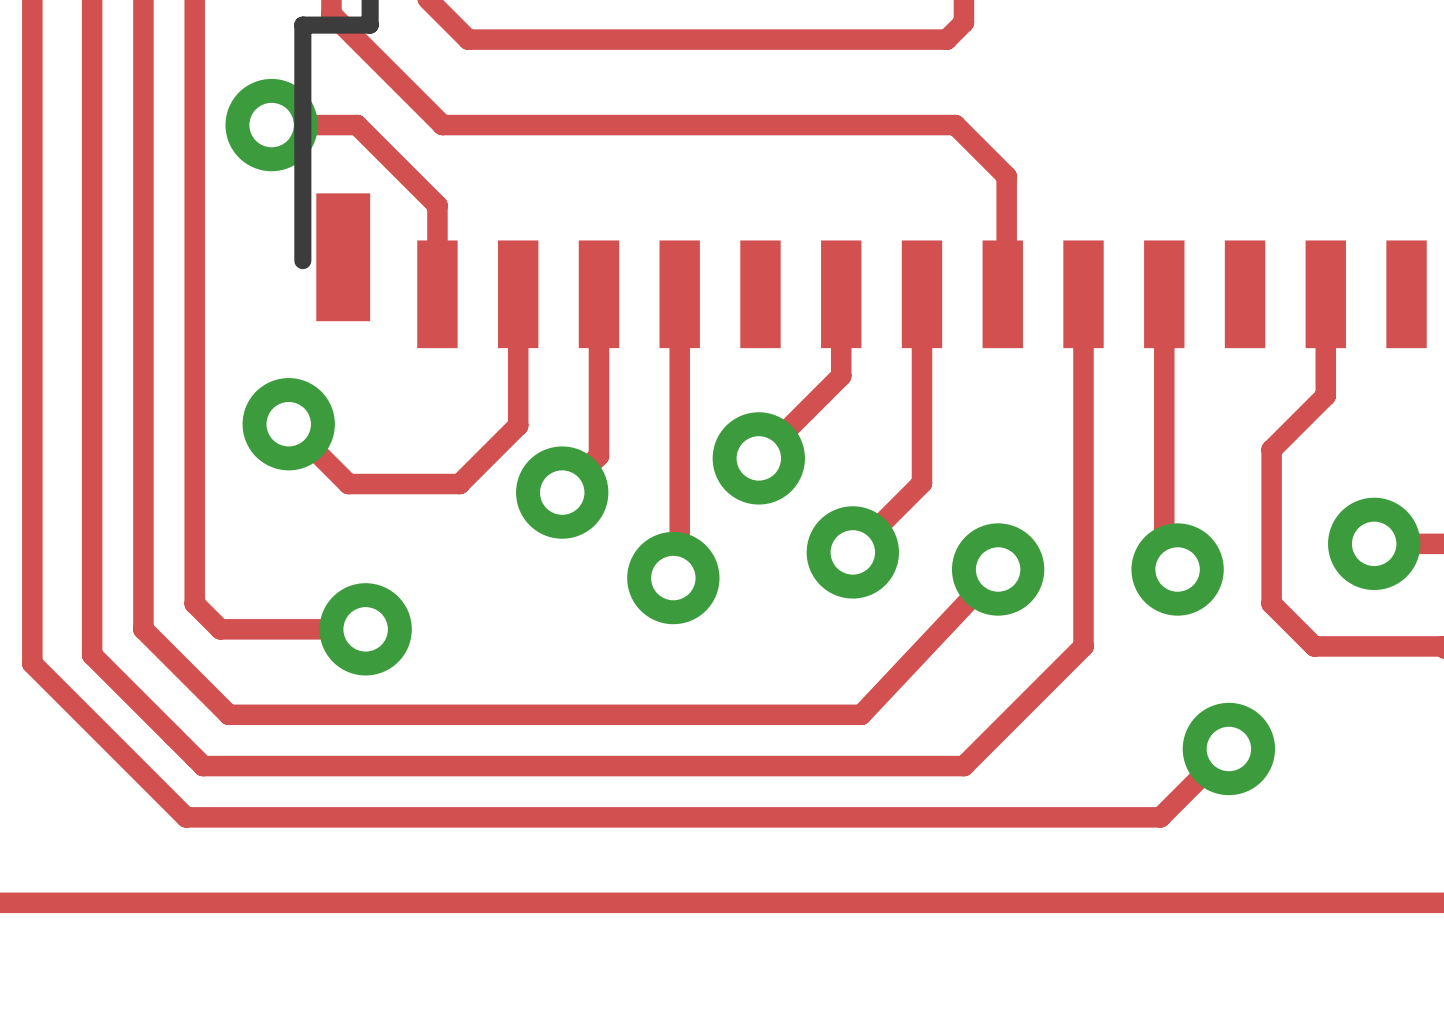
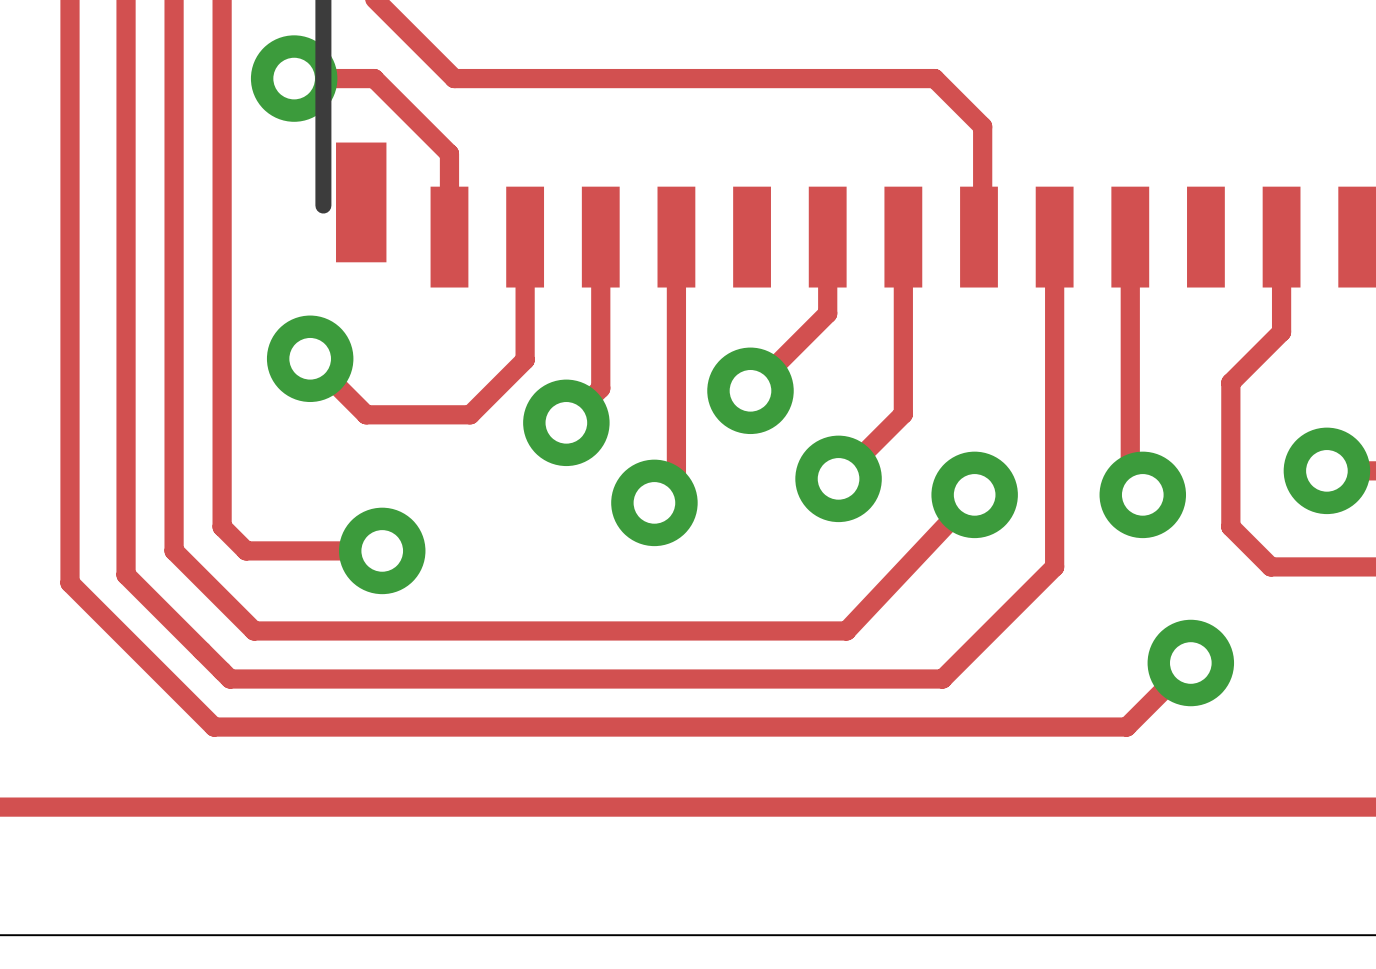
via position: (673, 578) -> (654, 502)

